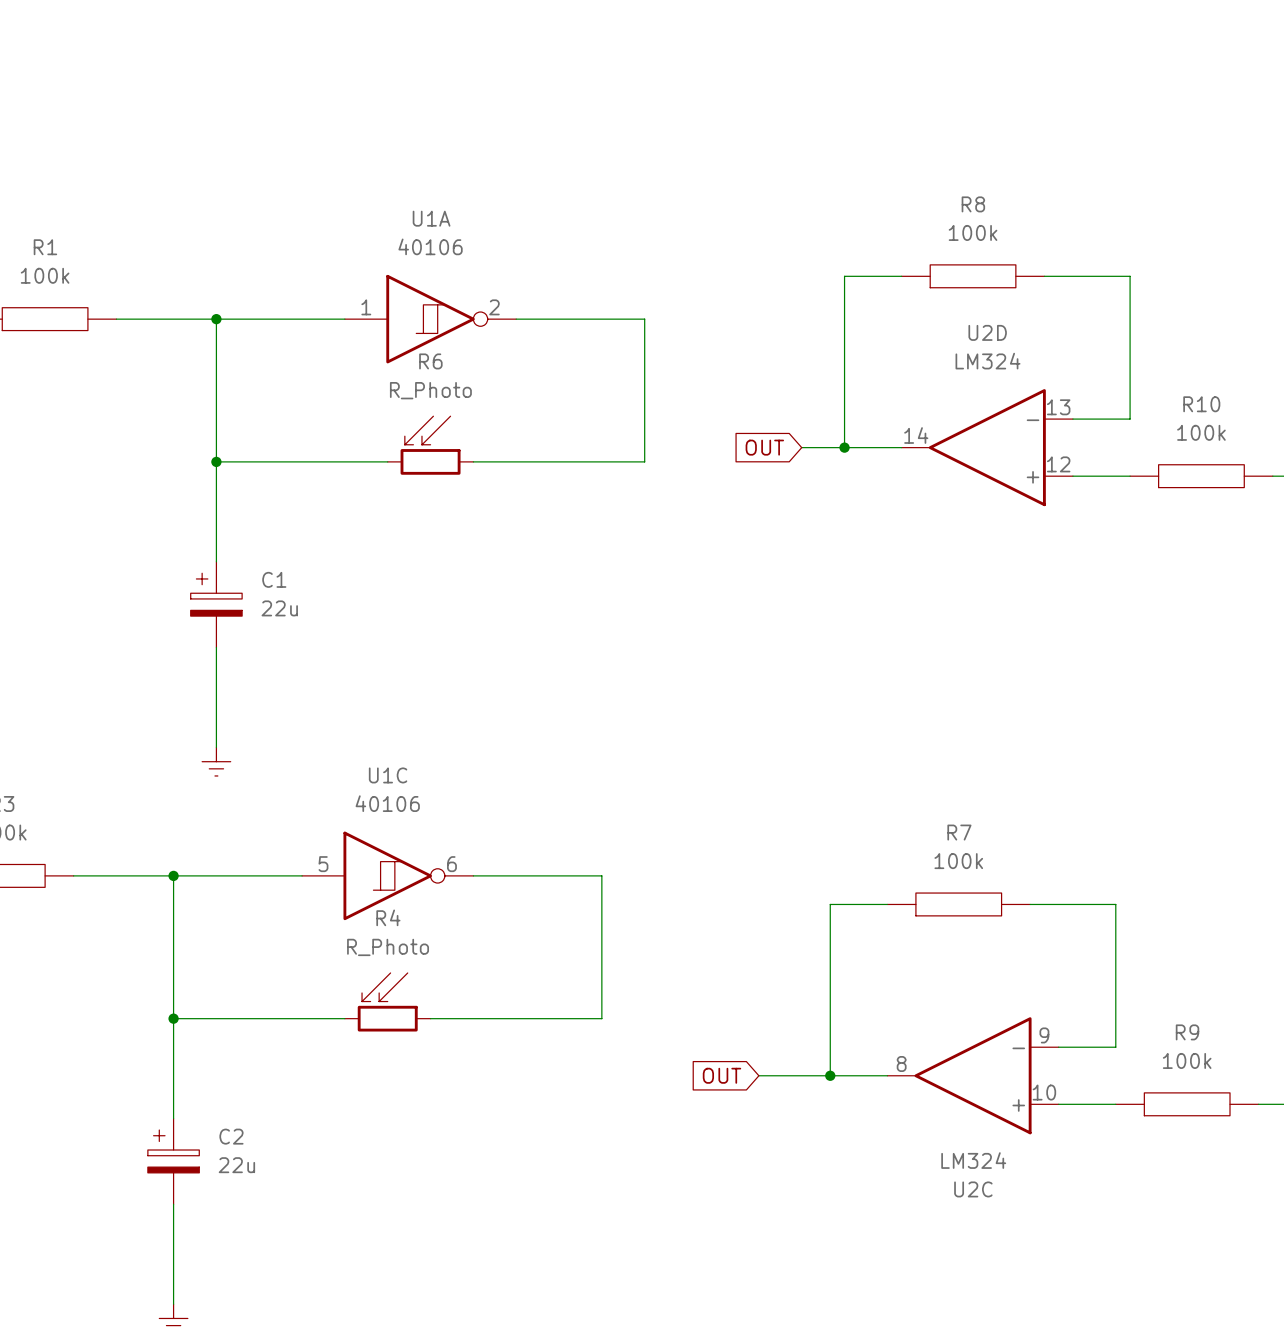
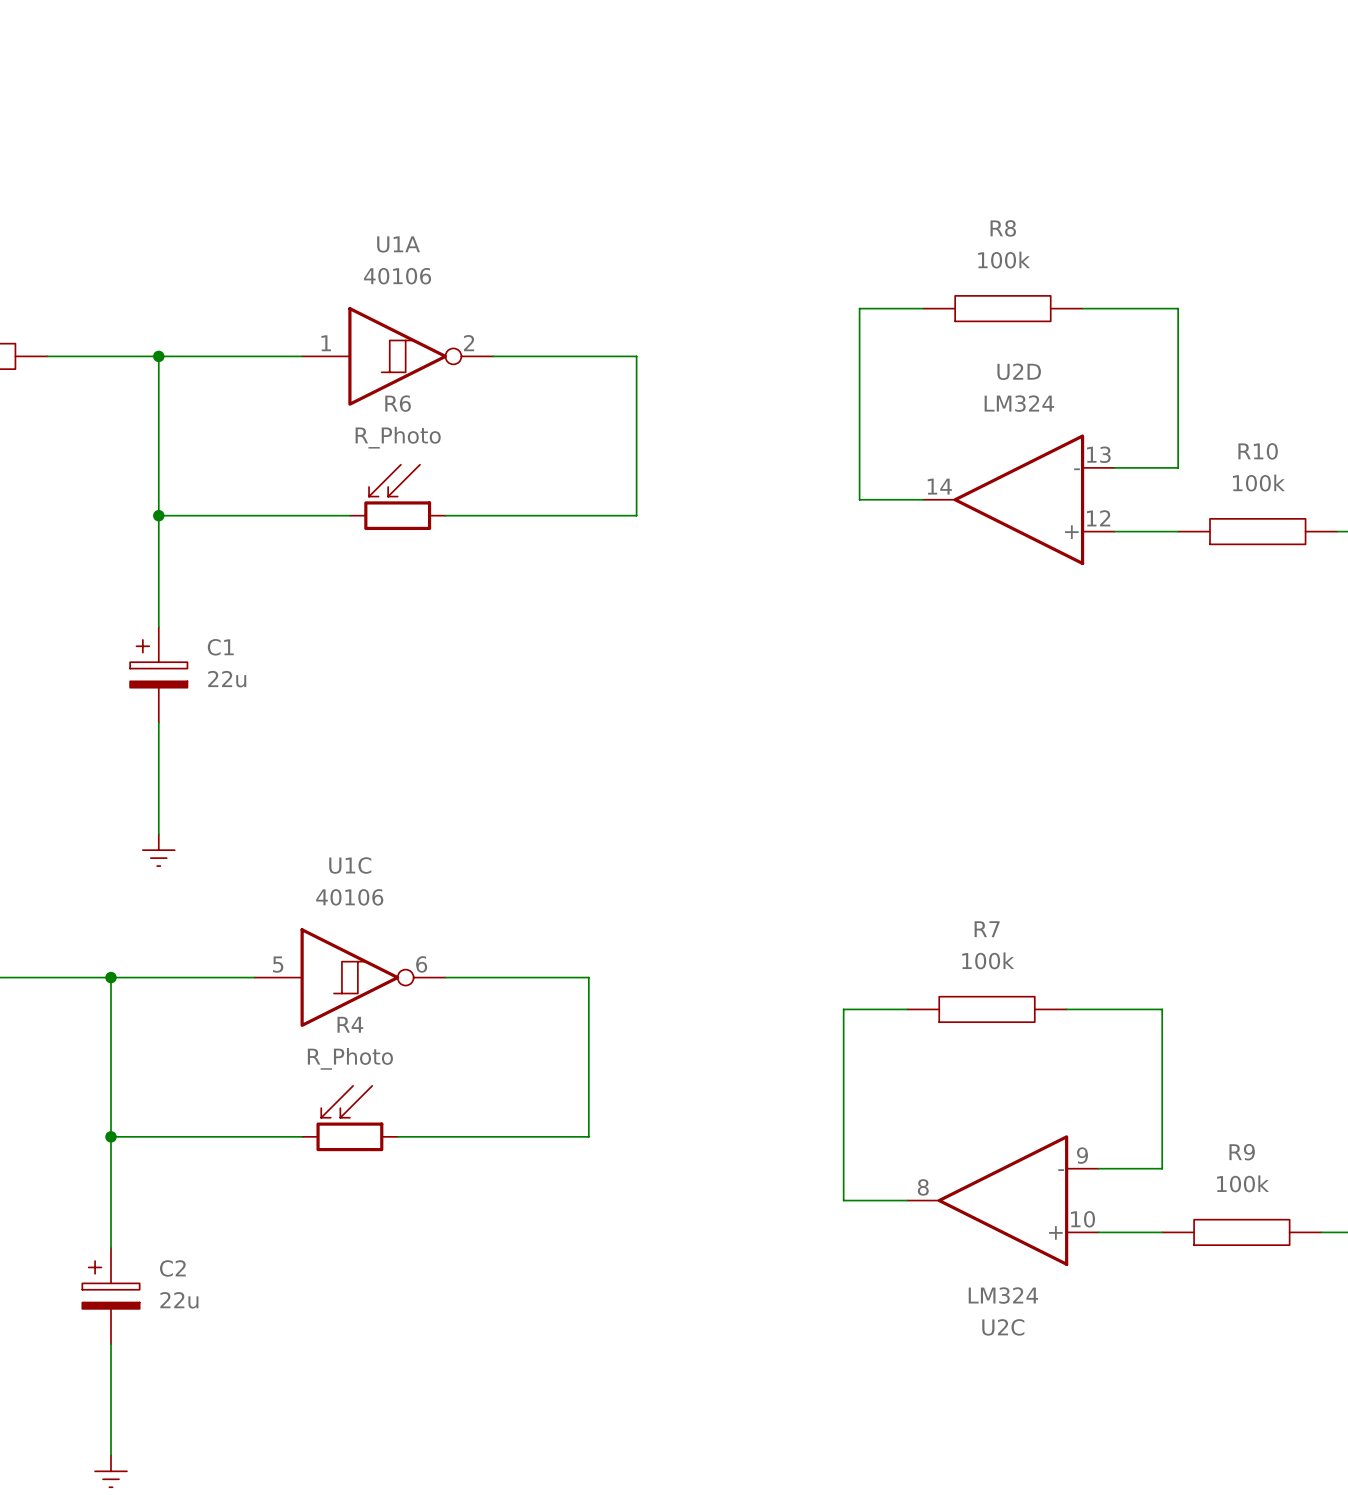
global label: OUT (764, 447) -> none
wire: (801, 447) (844, 447) -> none
junction: (844, 447) -> none
global label: OUT (721, 1075) -> none
wire: (758, 1075) (830, 1075) -> none
junction: (830, 1075) -> none

